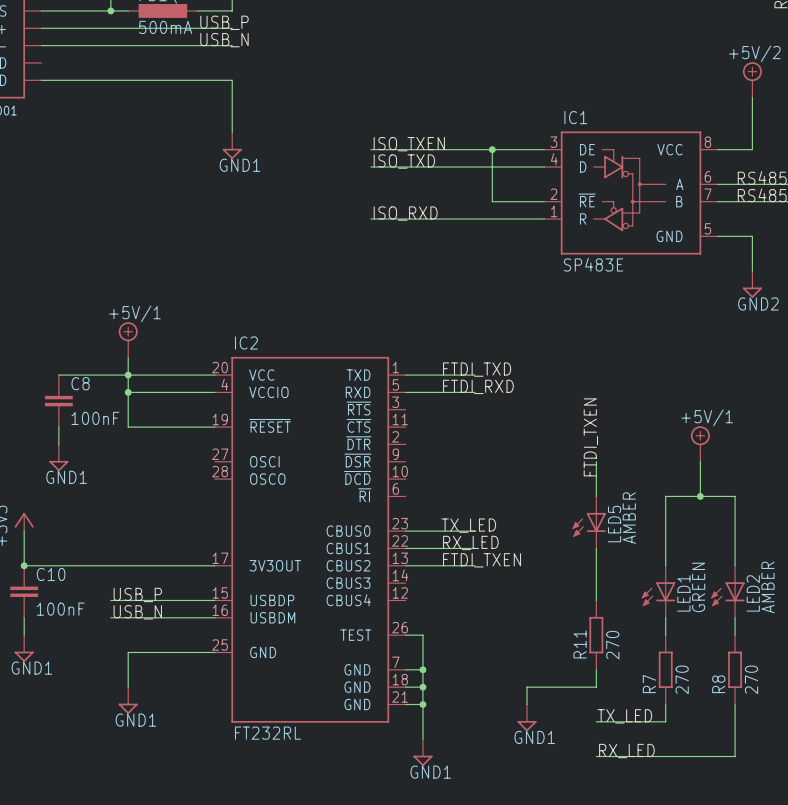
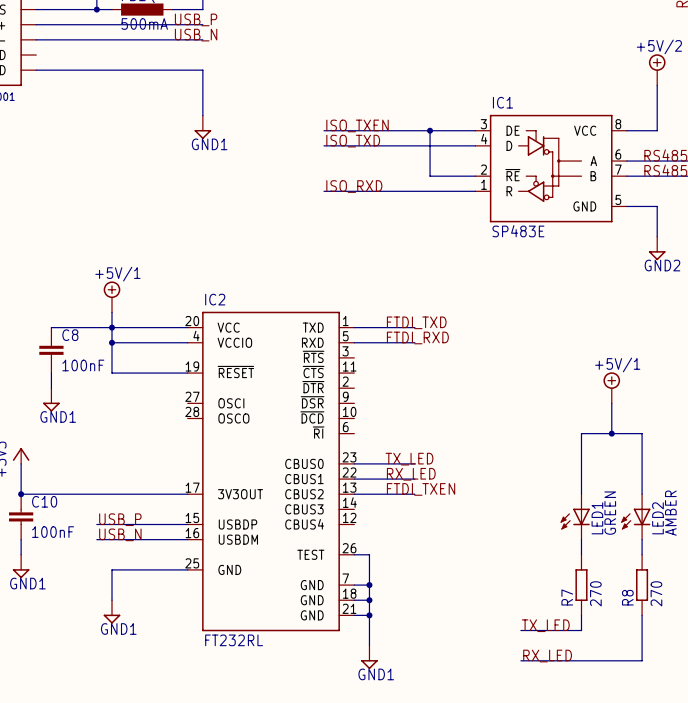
label: FTDI_TXEN (590, 437) -> none
wire: (596, 461) (596, 496) -> none
LED5: AMBER (589, 522) -> none
wire: (596, 548) (596, 600) -> none
R11: 270 (596, 635) -> none
wire: (596, 669) (596, 687) (527, 687) (527, 704) -> none
power symbol: GND1 (527, 717) -> none

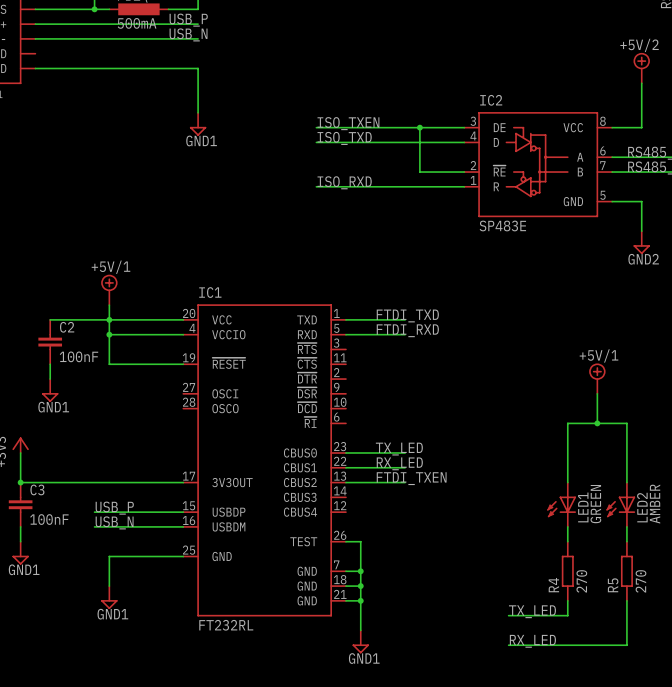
IC1 name: IC1 (502, 102) -> IC2 (491, 100)
IC2 name: IC2 (215, 299) -> IC1 (210, 292)
C8 name: C8 (70, 335) -> C2 (67, 327)
C10 name: C10 (44, 501) -> C3 (37, 489)
R7 name: R7 (567, 597) -> R4 (553, 585)
R8 name: R8 (627, 597) -> R5 (613, 585)

